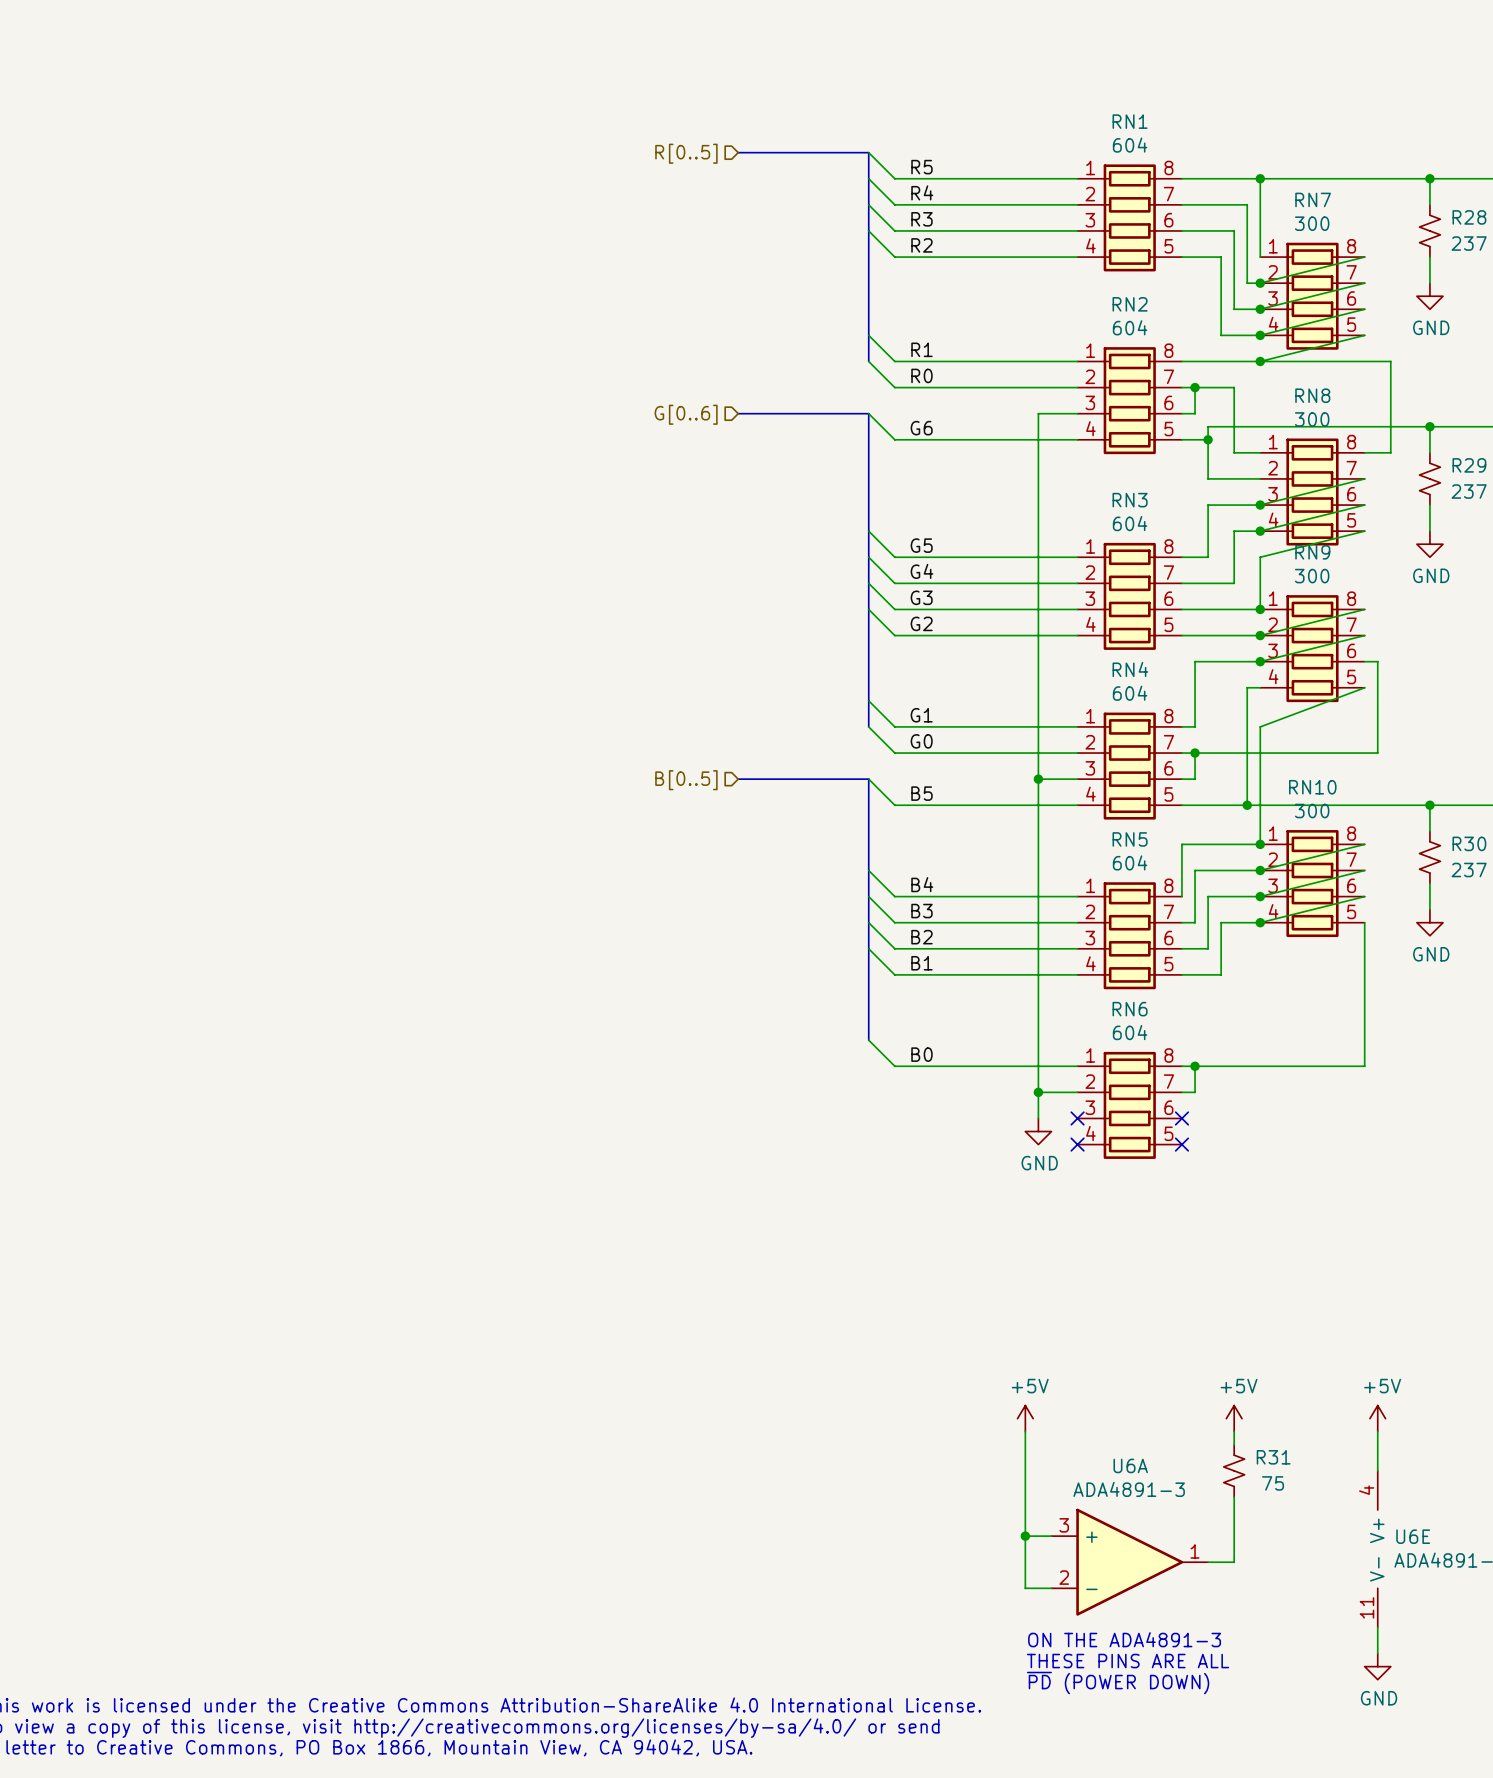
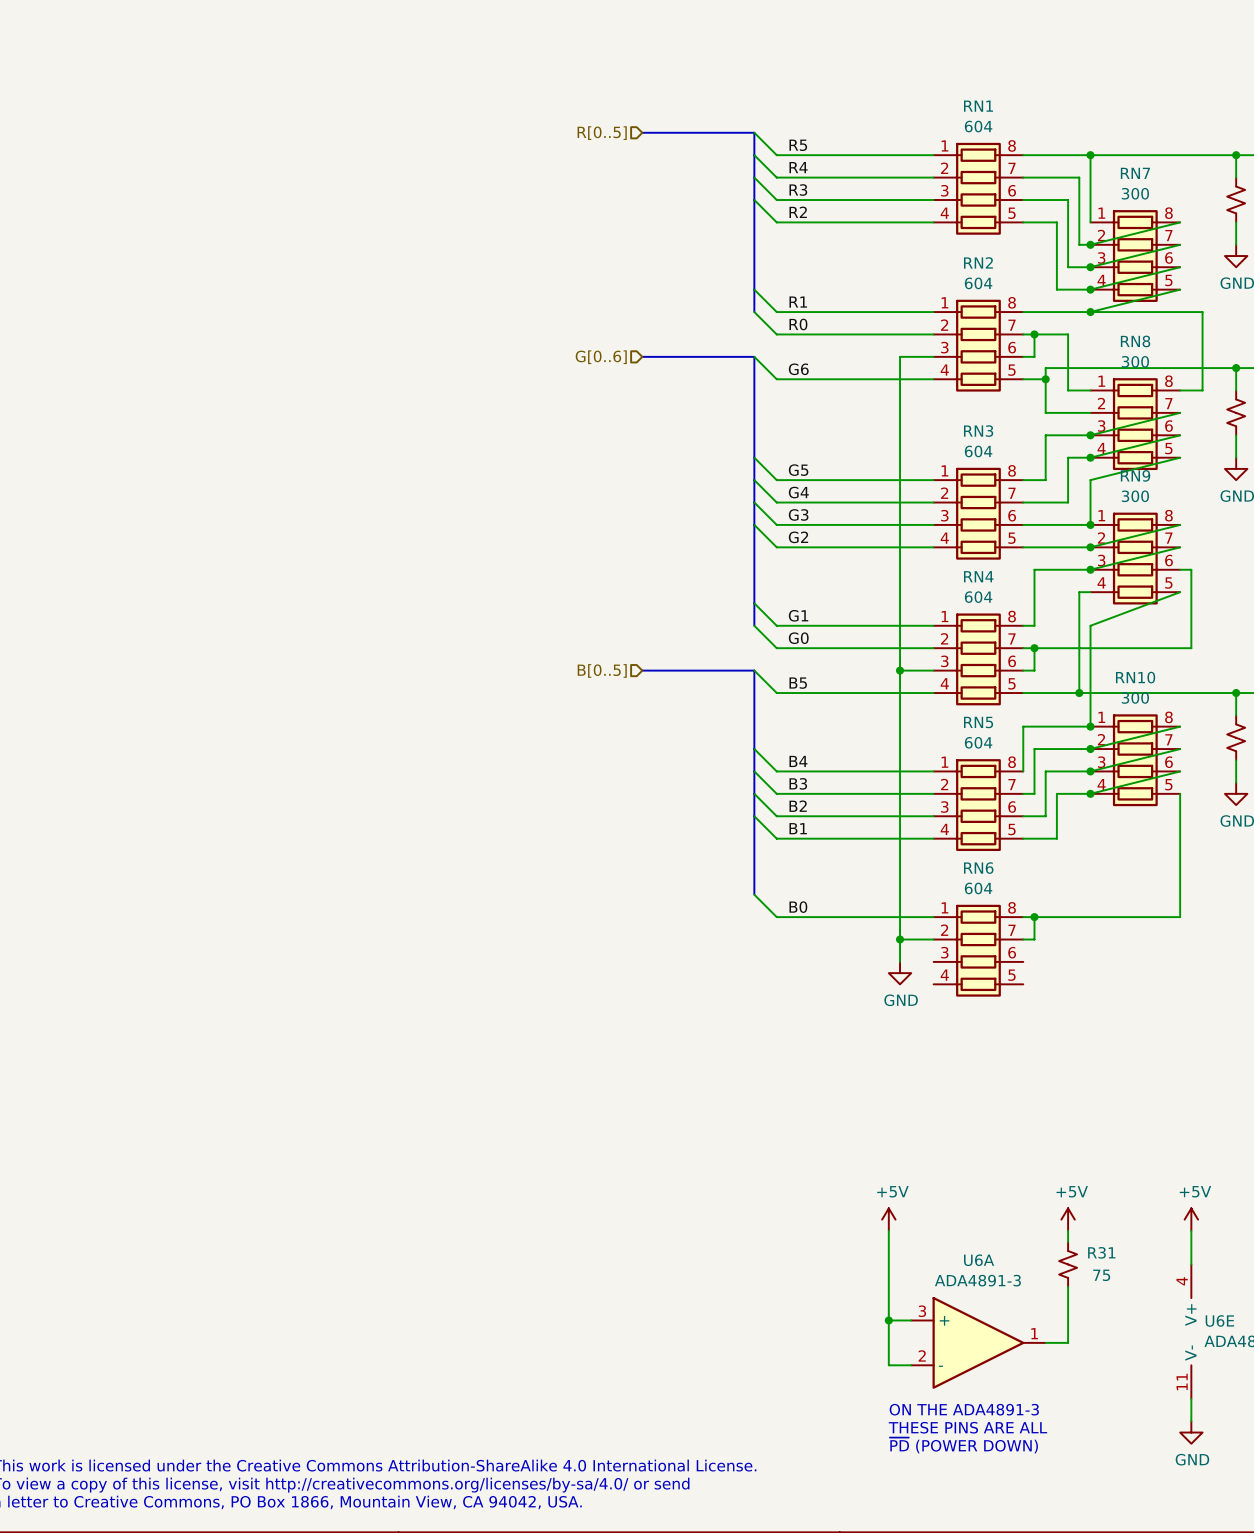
no-connect mark: (1077, 1118) -> none
no-connect mark: (1181, 1118) -> none
no-connect mark: (1077, 1144) -> none
no-connect mark: (1181, 1144) -> none

